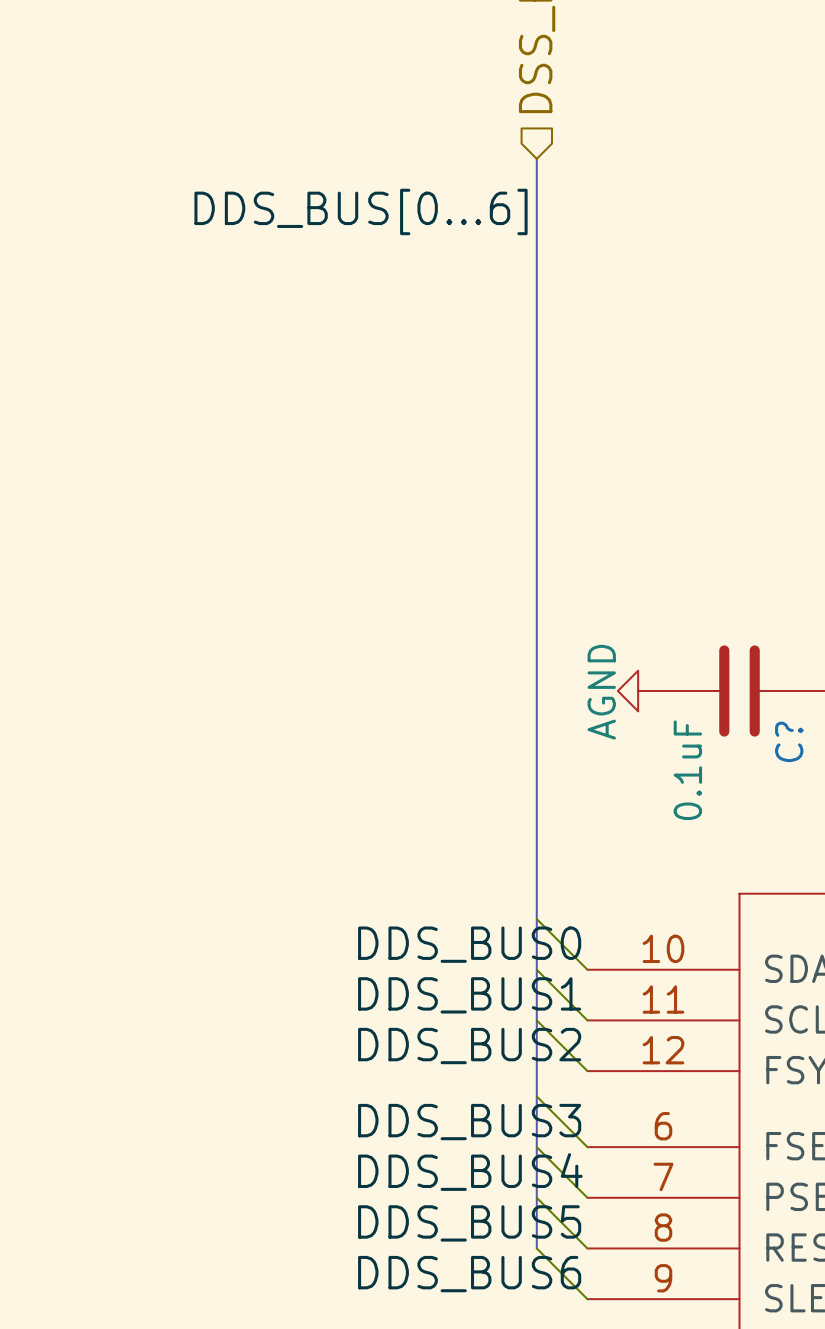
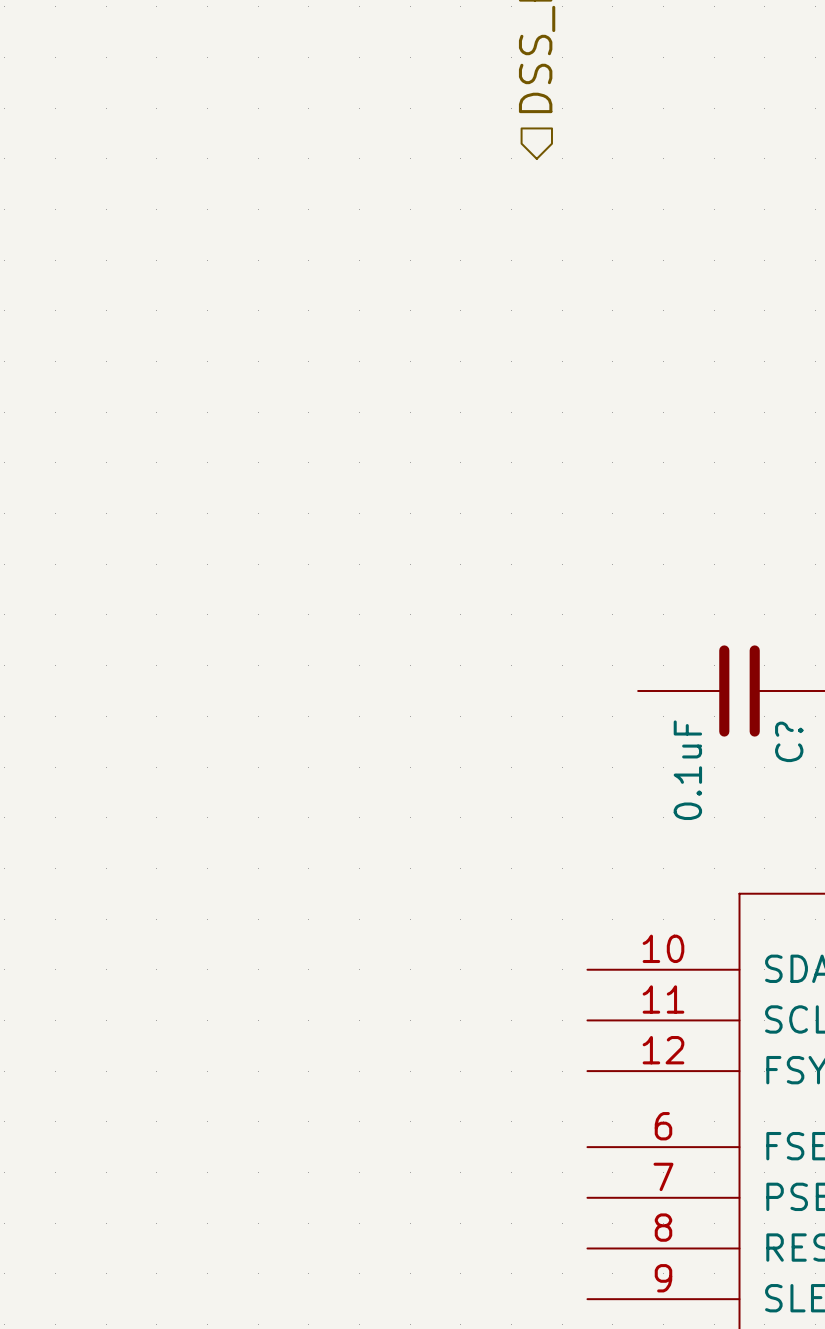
bus: (536, 158) (536, 1248) -> none
label: DDS_BUS[0...6] (361, 211) -> none
power symbol: AGND (628, 691) -> none
wire: (536, 919) (587, 969) -> none
label: DDS_BUS0 (469, 944) -> none
wire: (536, 969) (587, 1020) -> none
label: DDS_BUS1 (469, 995) -> none
wire: (536, 1020) (587, 1071) -> none
label: DDS_BUS2 (469, 1046) -> none
wire: (536, 1096) (587, 1147) -> none
label: DDS_BUS3 (469, 1122) -> none
wire: (536, 1147) (587, 1197) -> none
label: DDS_BUS4 (470, 1171) -> none
wire: (536, 1197) (587, 1248) -> none
label: DDS_BUS5 (469, 1223) -> none
wire: (536, 1248) (587, 1299) -> none
label: DDS_BUS6 (469, 1274) -> none

